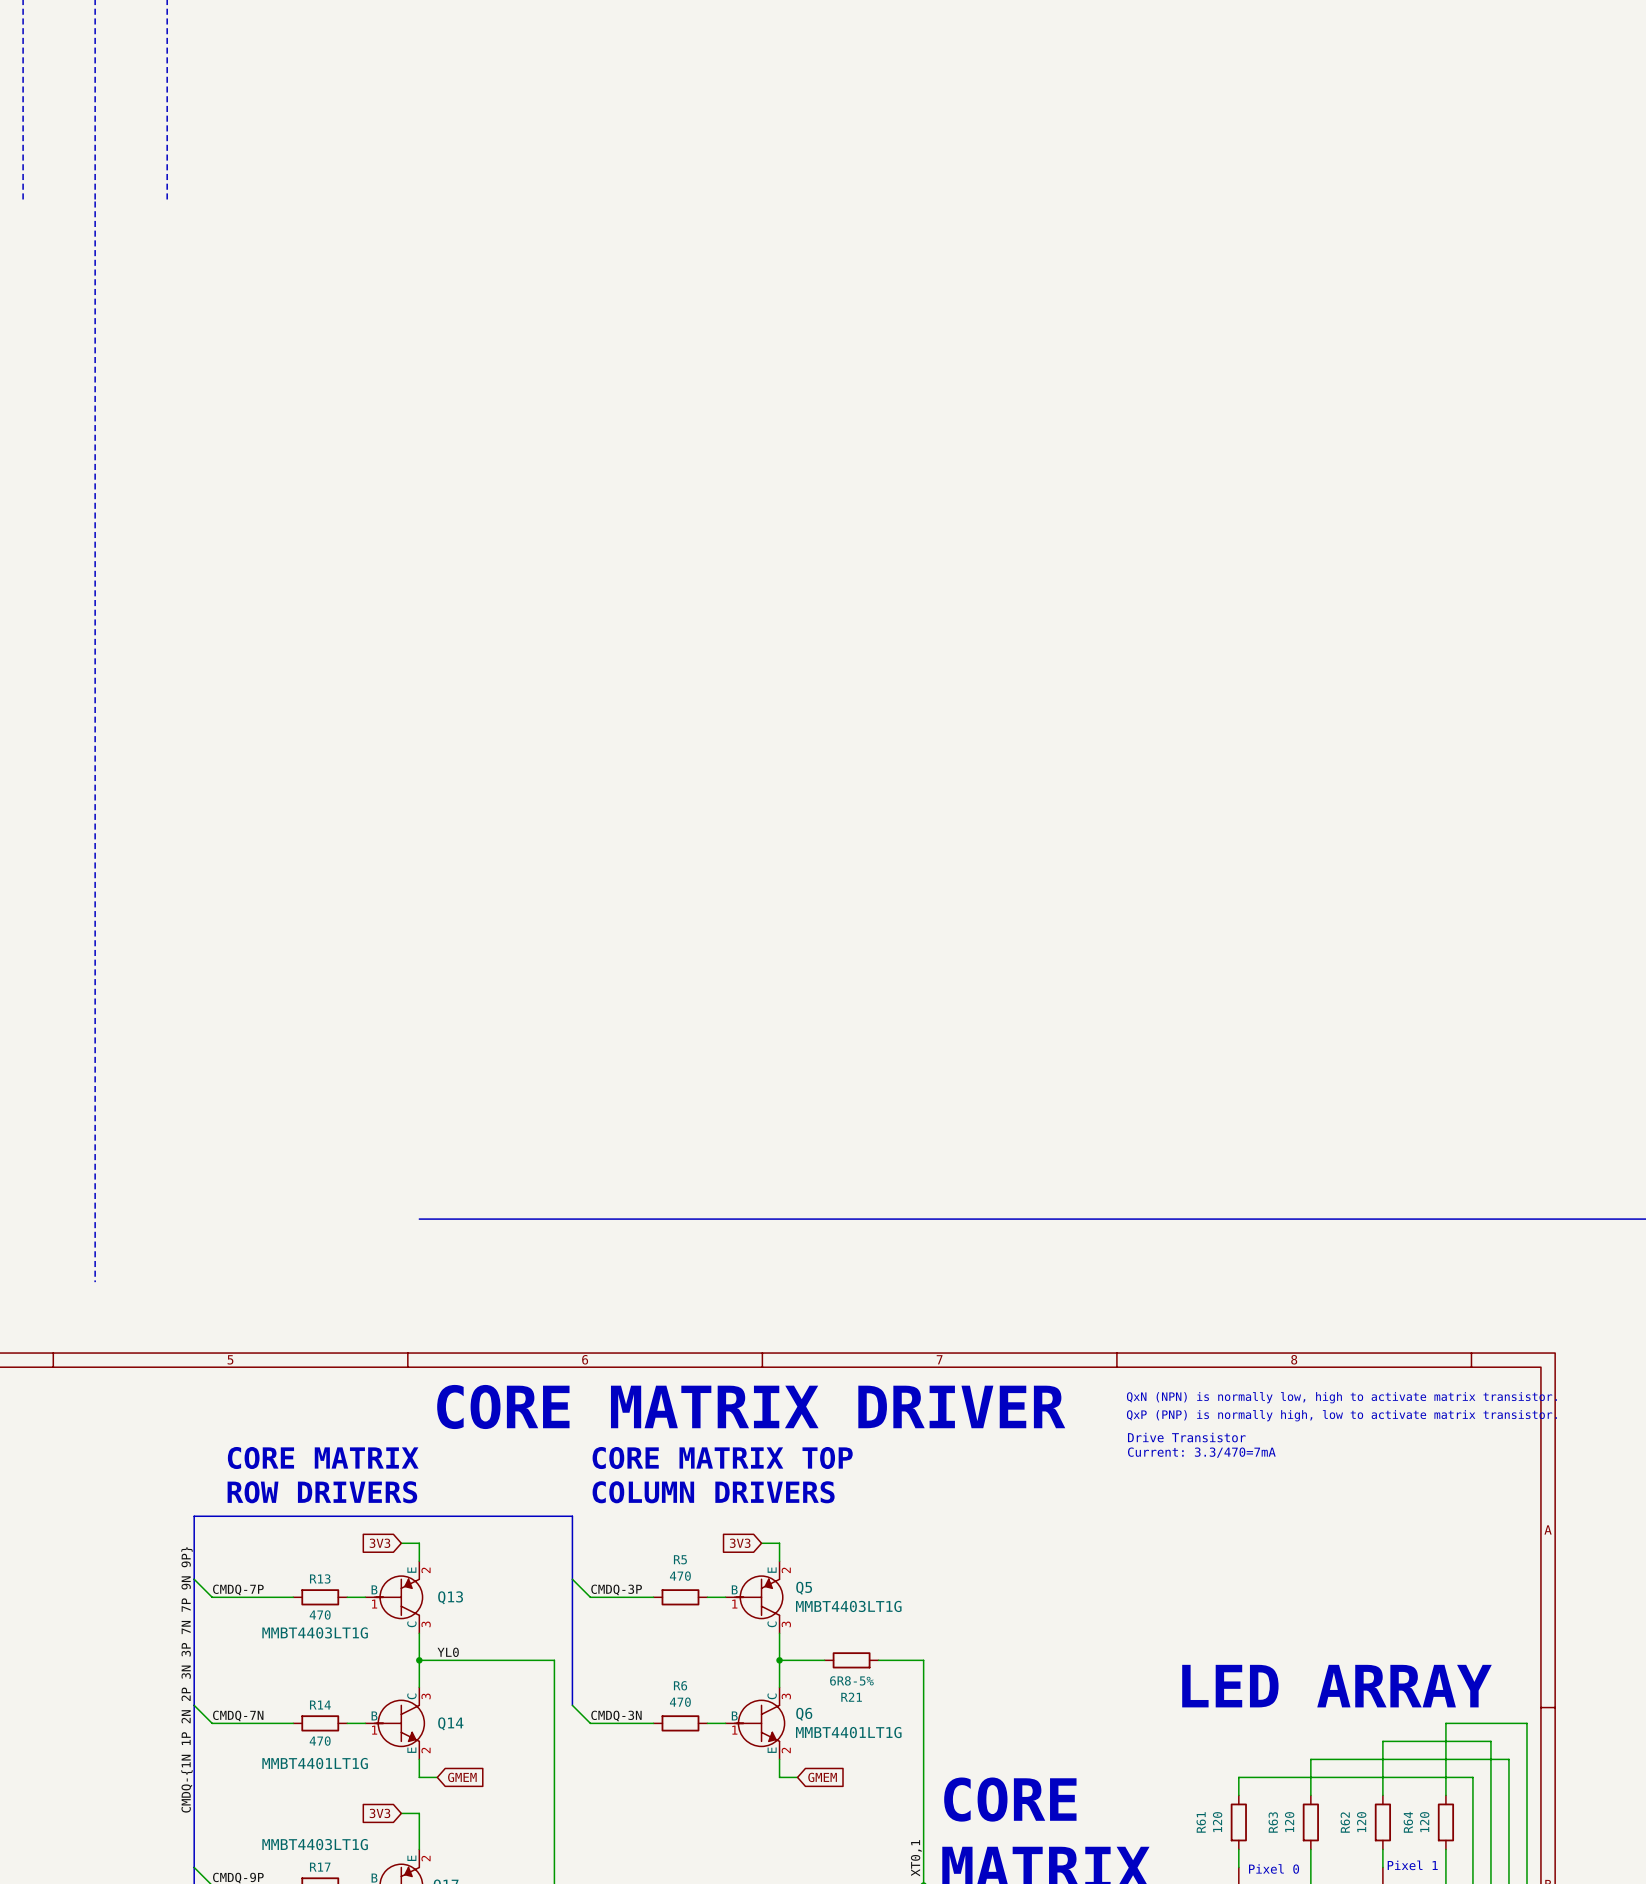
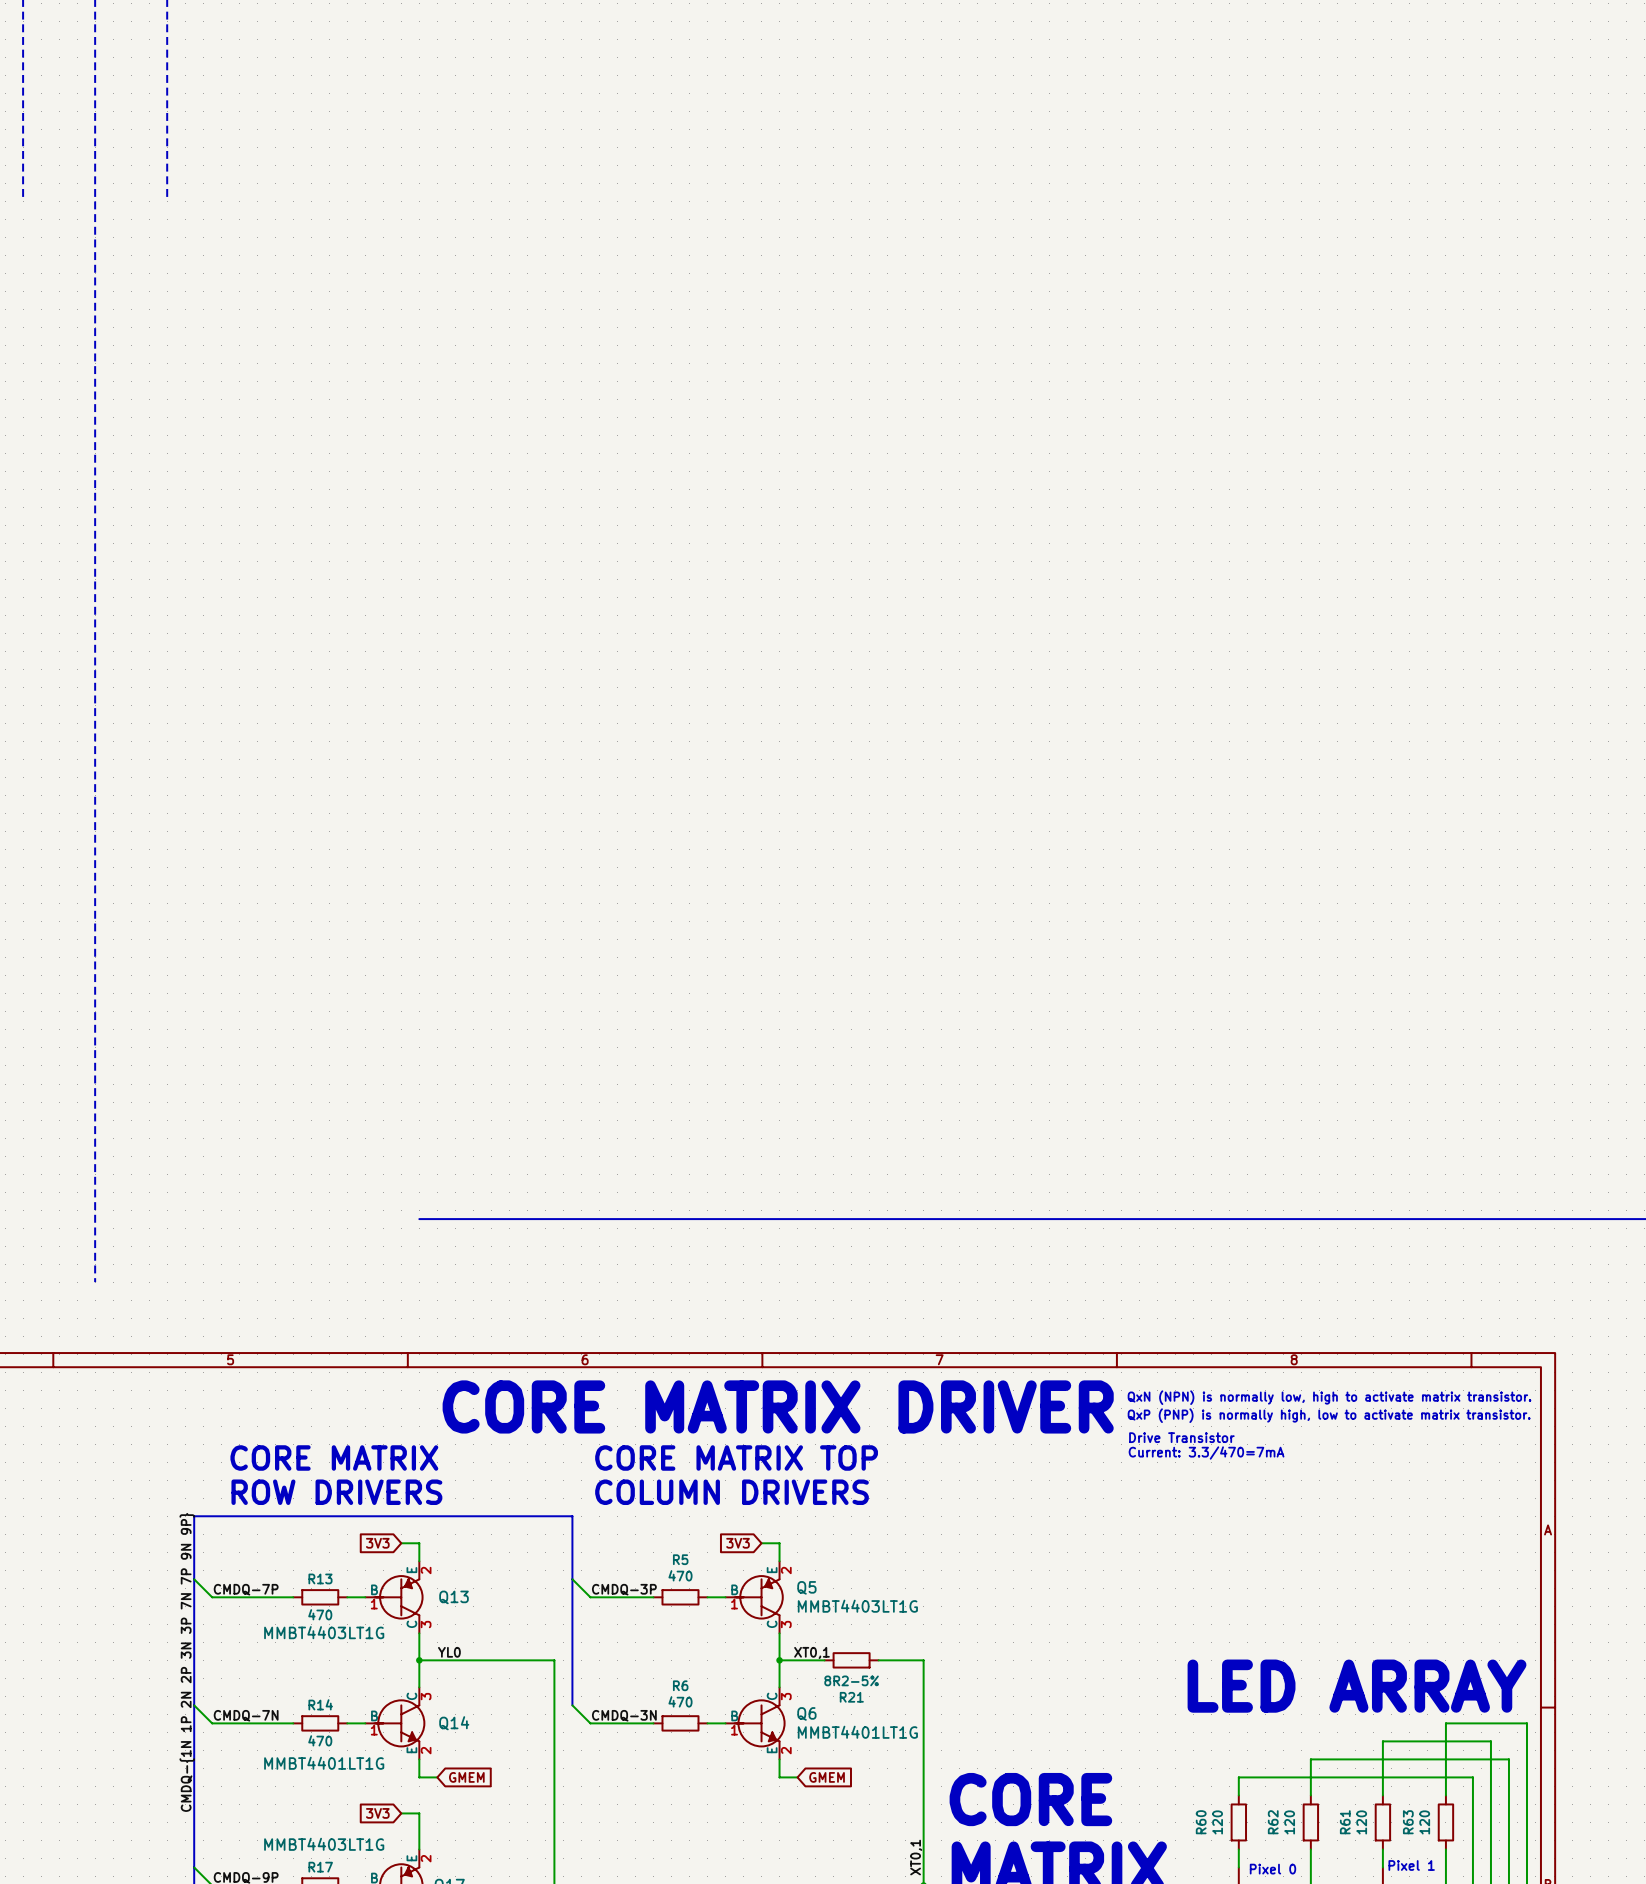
label: none -> XT0,1 (811, 1652)
R21 value: 6R8-5% (851, 1680) -> 8R2-5% (851, 1680)
R61 name: R61 (1201, 1822) -> R60 (1201, 1822)
R63 name: R63 (1273, 1822) -> R62 (1273, 1822)
R62 name: R62 (1345, 1822) -> R61 (1345, 1822)
R64 name: R64 (1408, 1822) -> R63 (1408, 1822)

